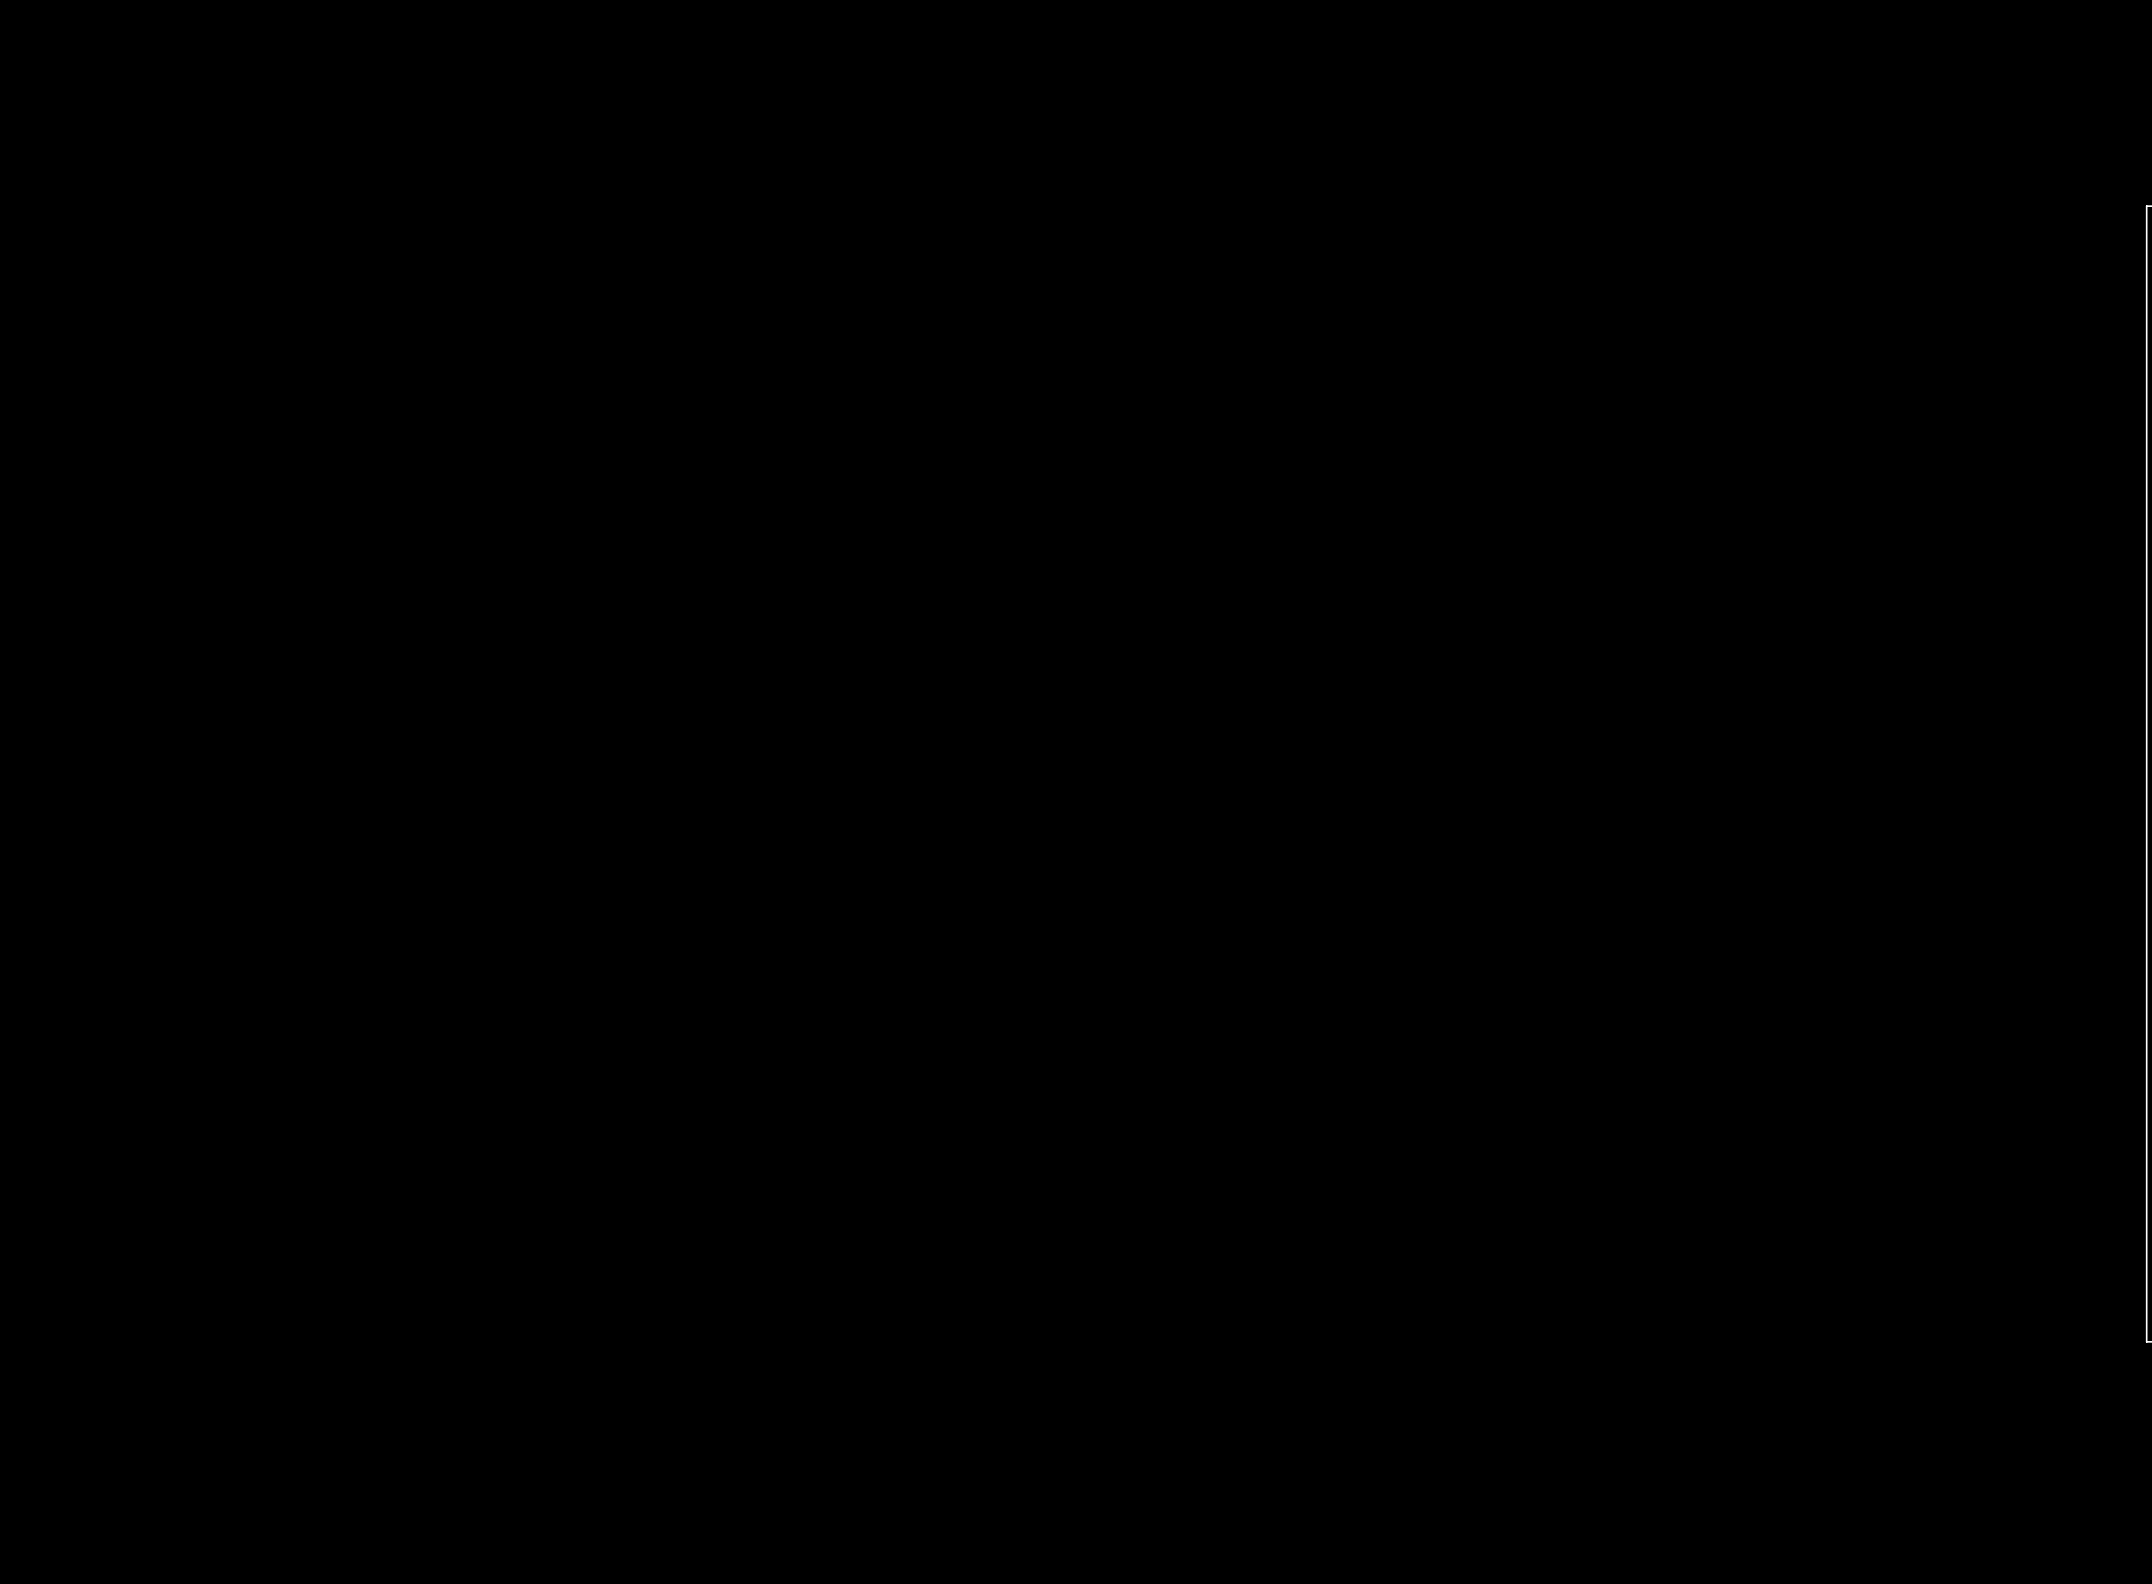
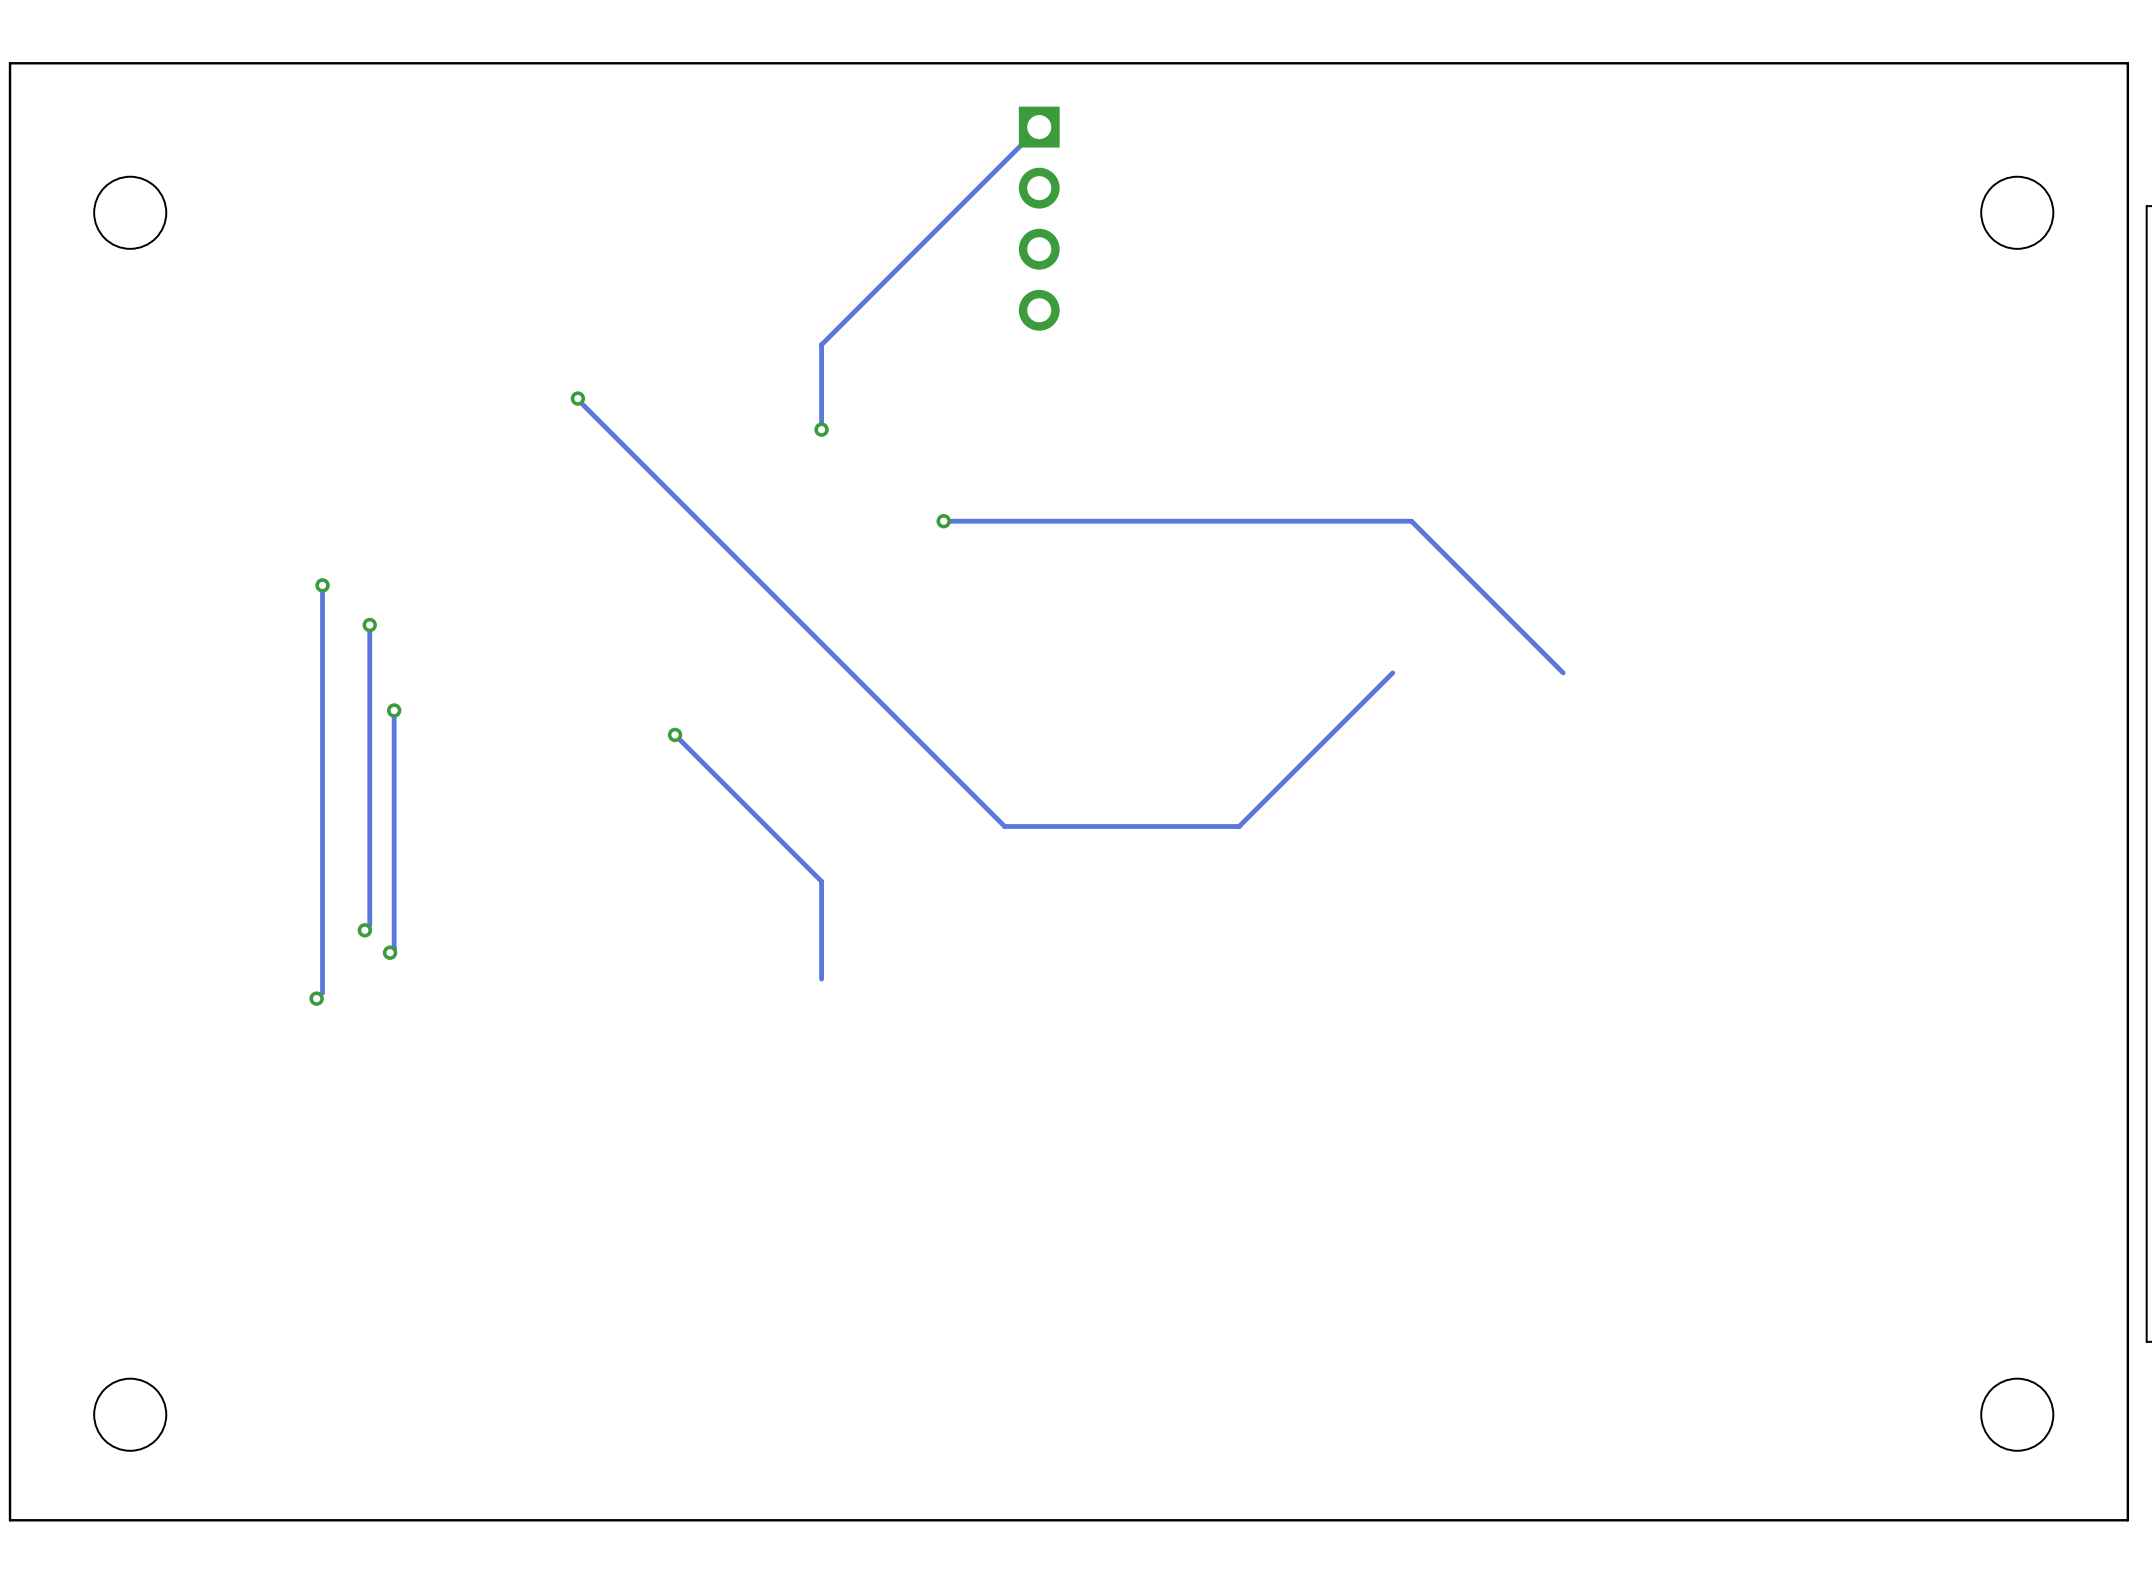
board edge: none -> (2127, 63) (10, 63) (10, 1520) (2127, 1520) (2127, 63)
track: none -> (1039, 127) (821, 344) (821, 429)
round board edge: none -> [93, 176, 167, 250]
round board edge: none -> [1980, 176, 2054, 250]
part: none -> (1039, 218)
track: none -> (577, 398) (1004, 826) (1239, 826) (1392, 672)
via: none -> (577, 398)
via: none -> (821, 429)
track: none -> (943, 521) (1411, 521) (1563, 672)
via: none -> (943, 521)
track: none -> (322, 585) (322, 992) (316, 998)
via: none -> (322, 585)
track: none -> (369, 625) (369, 925) (365, 929)
via: none -> (369, 625)
track: none -> (394, 710) (394, 948) (390, 952)
via: none -> (394, 710)
track: none -> (675, 734) (821, 881) (821, 979)
via: none -> (675, 734)
via: none -> (364, 930)
via: none -> (390, 952)
via: none -> (316, 998)
round board edge: none -> [93, 1378, 167, 1452]
round board edge: none -> [1980, 1378, 2054, 1452]

